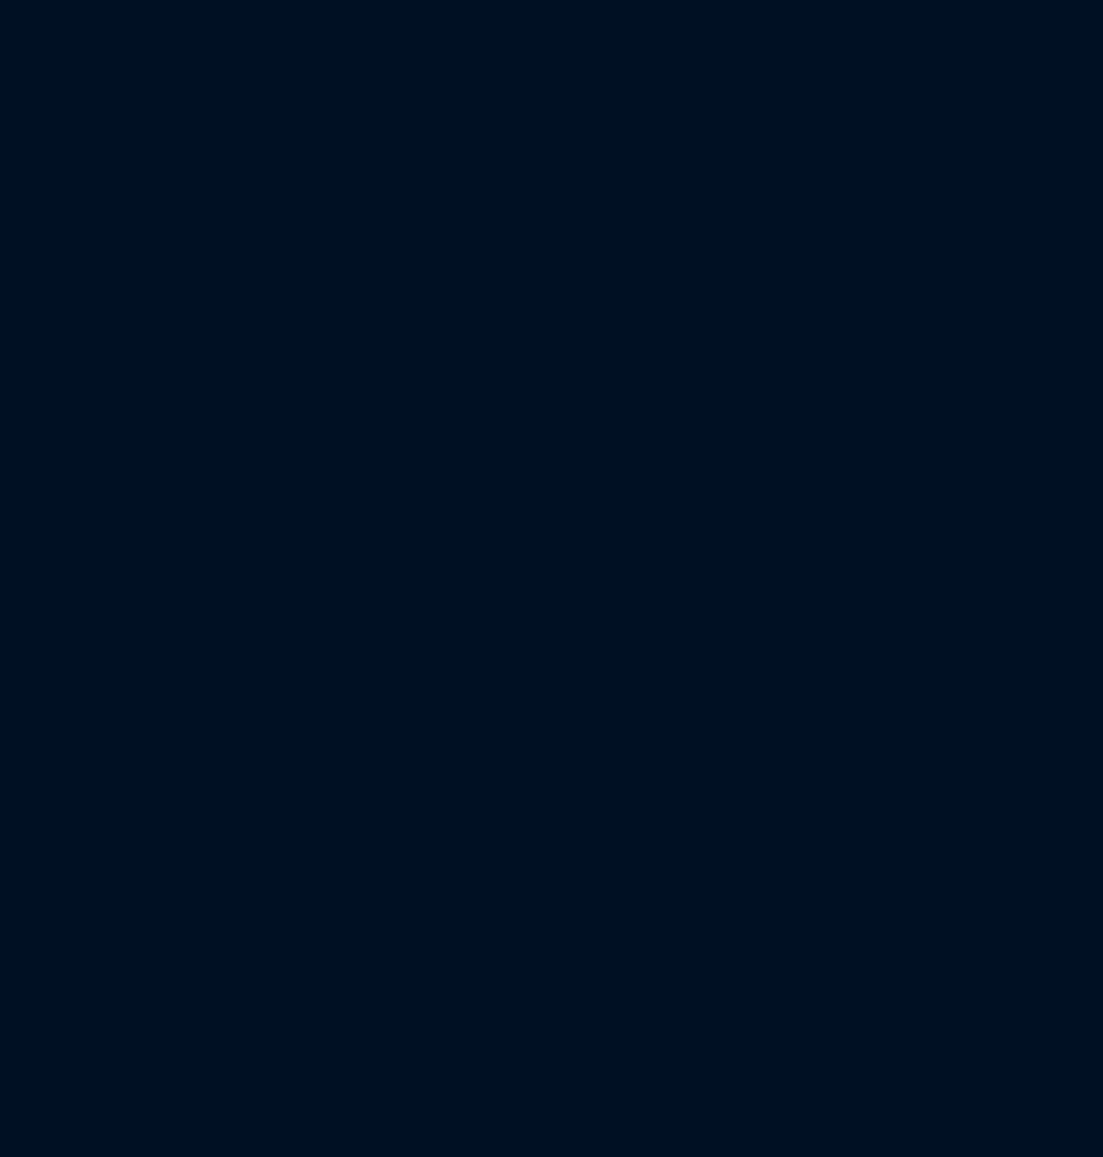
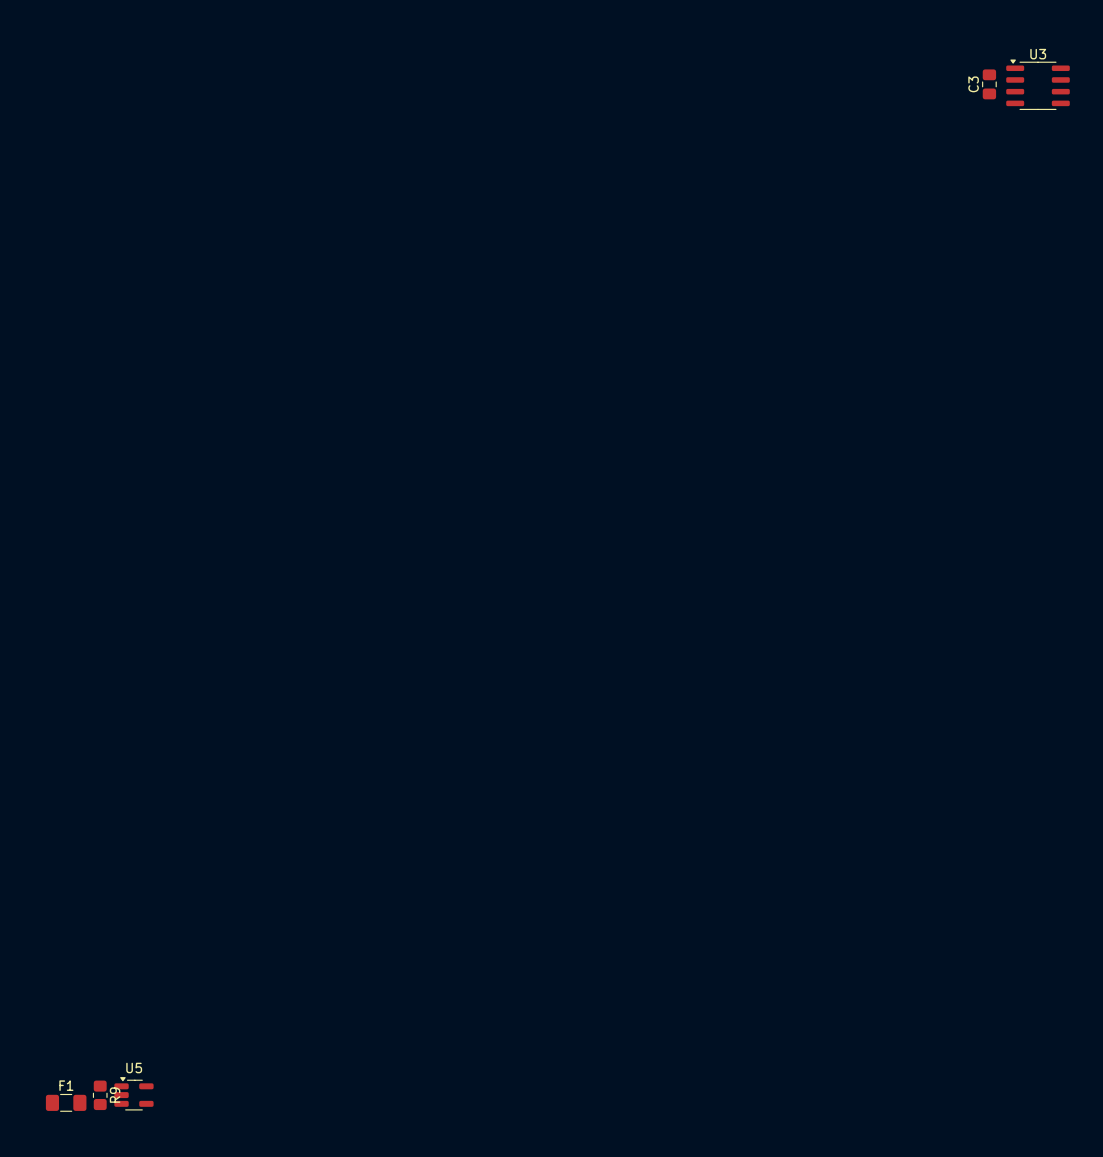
C3: none -> (989, 84)
U3: none -> (1038, 84)
U5: none -> (133, 1093)
R9: none -> (100, 1095)
F1: none -> (66, 1102)

